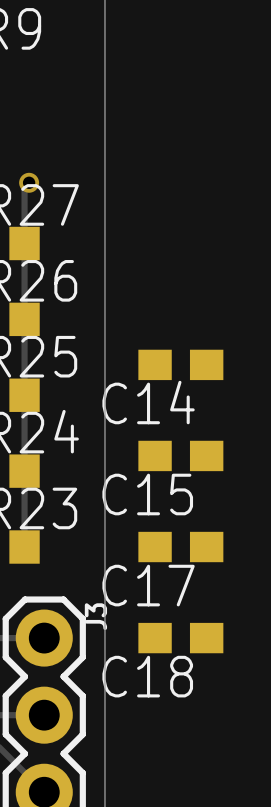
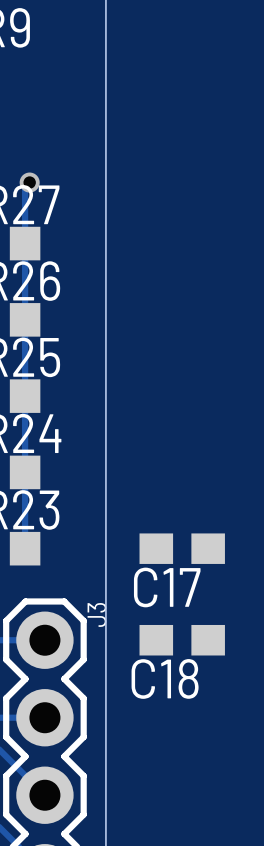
C14: (180, 364) -> none
C15: (180, 455) -> none

